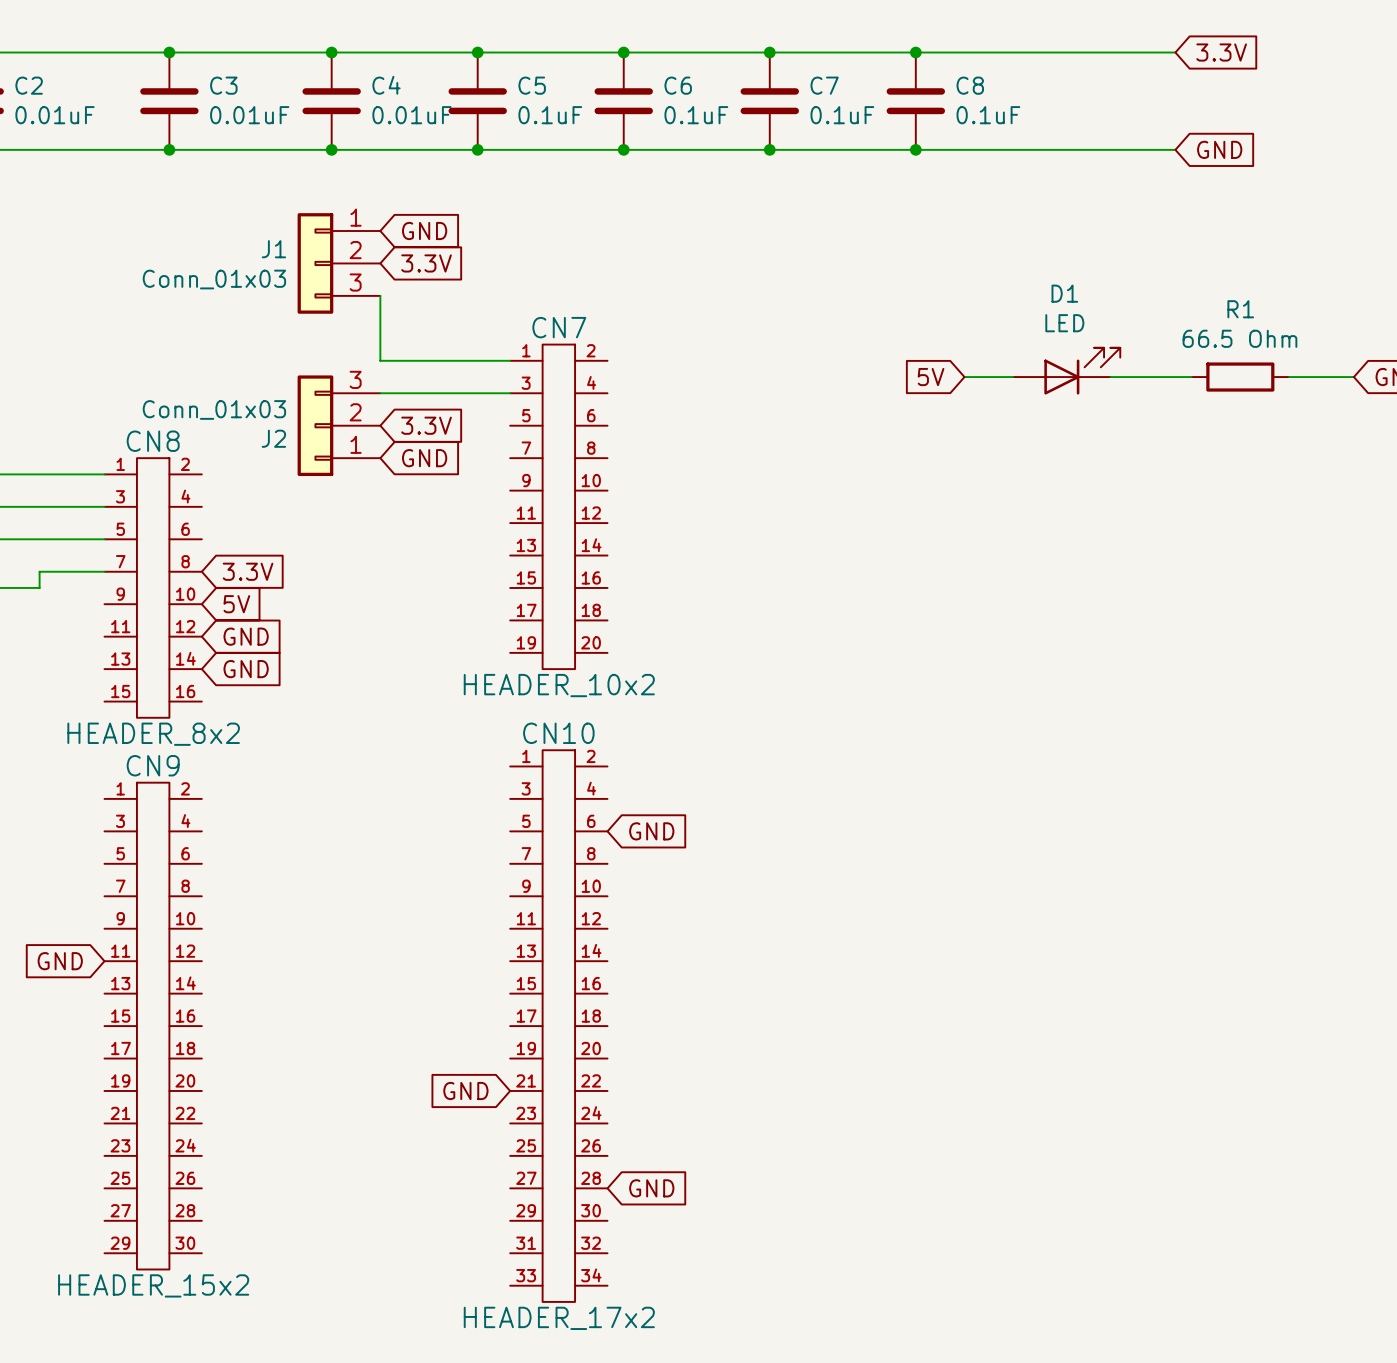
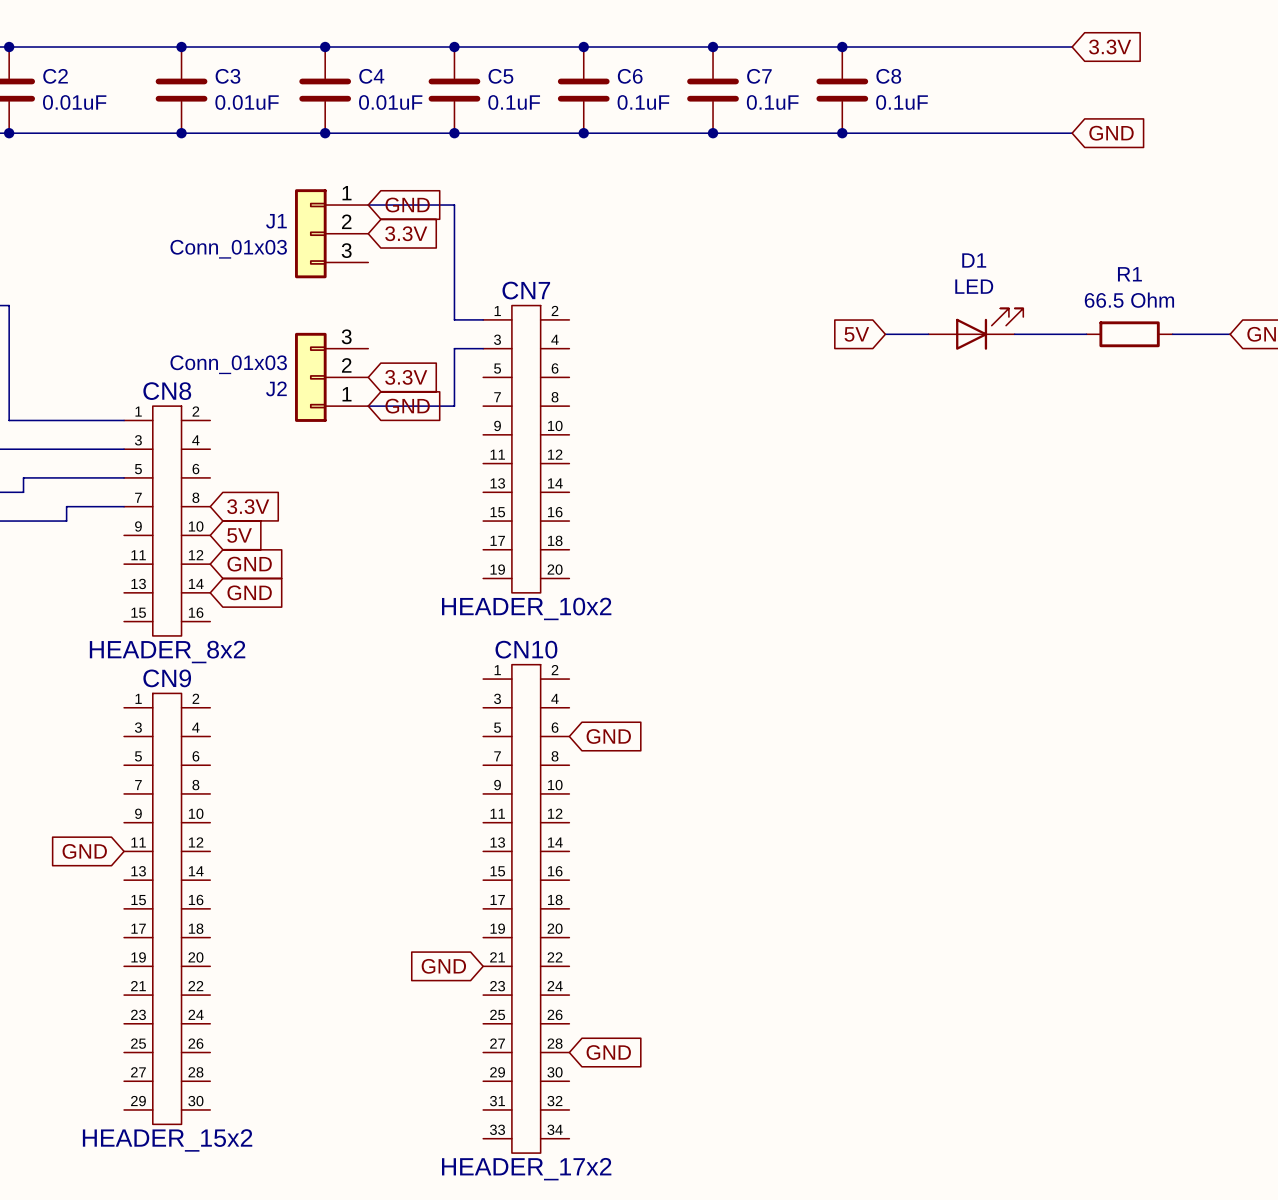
wire: (380, 295) (380, 360) (477, 360) -> (368, 205) (454, 205) (454, 319)
wire: (380, 393) (477, 393) -> (368, 406) (454, 406) (454, 348)

